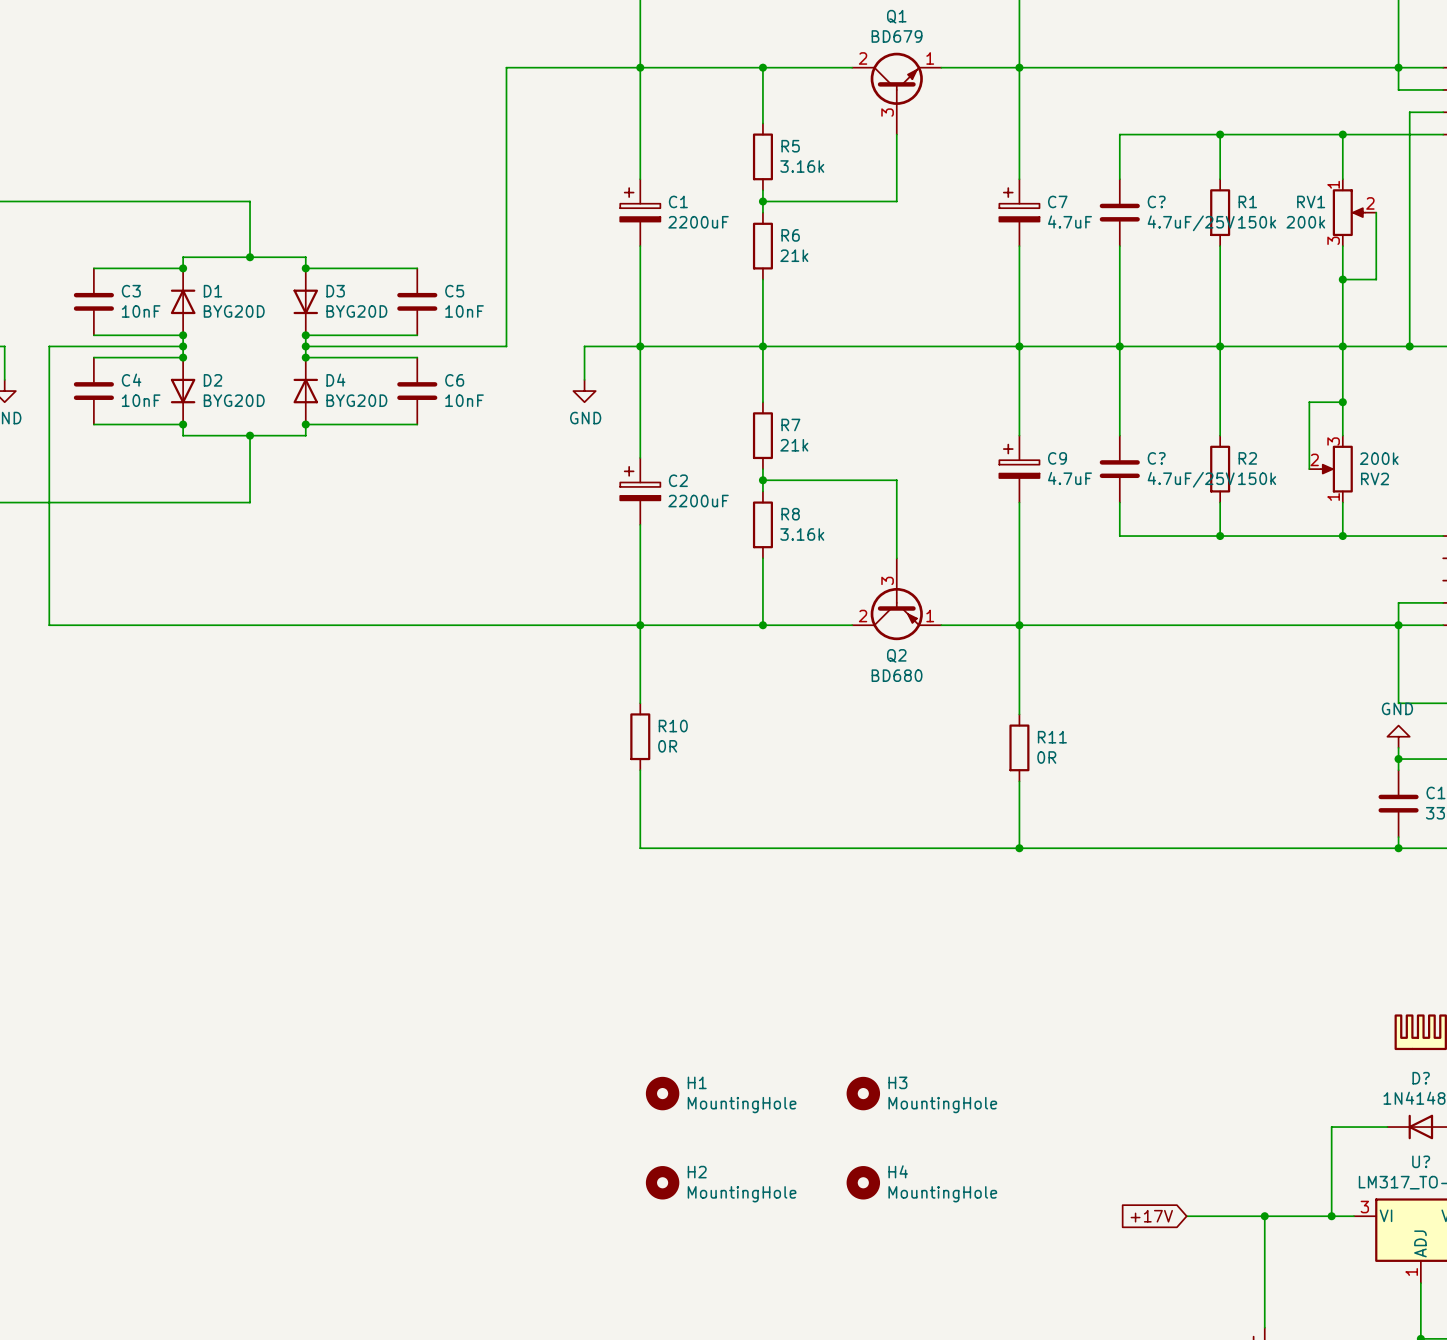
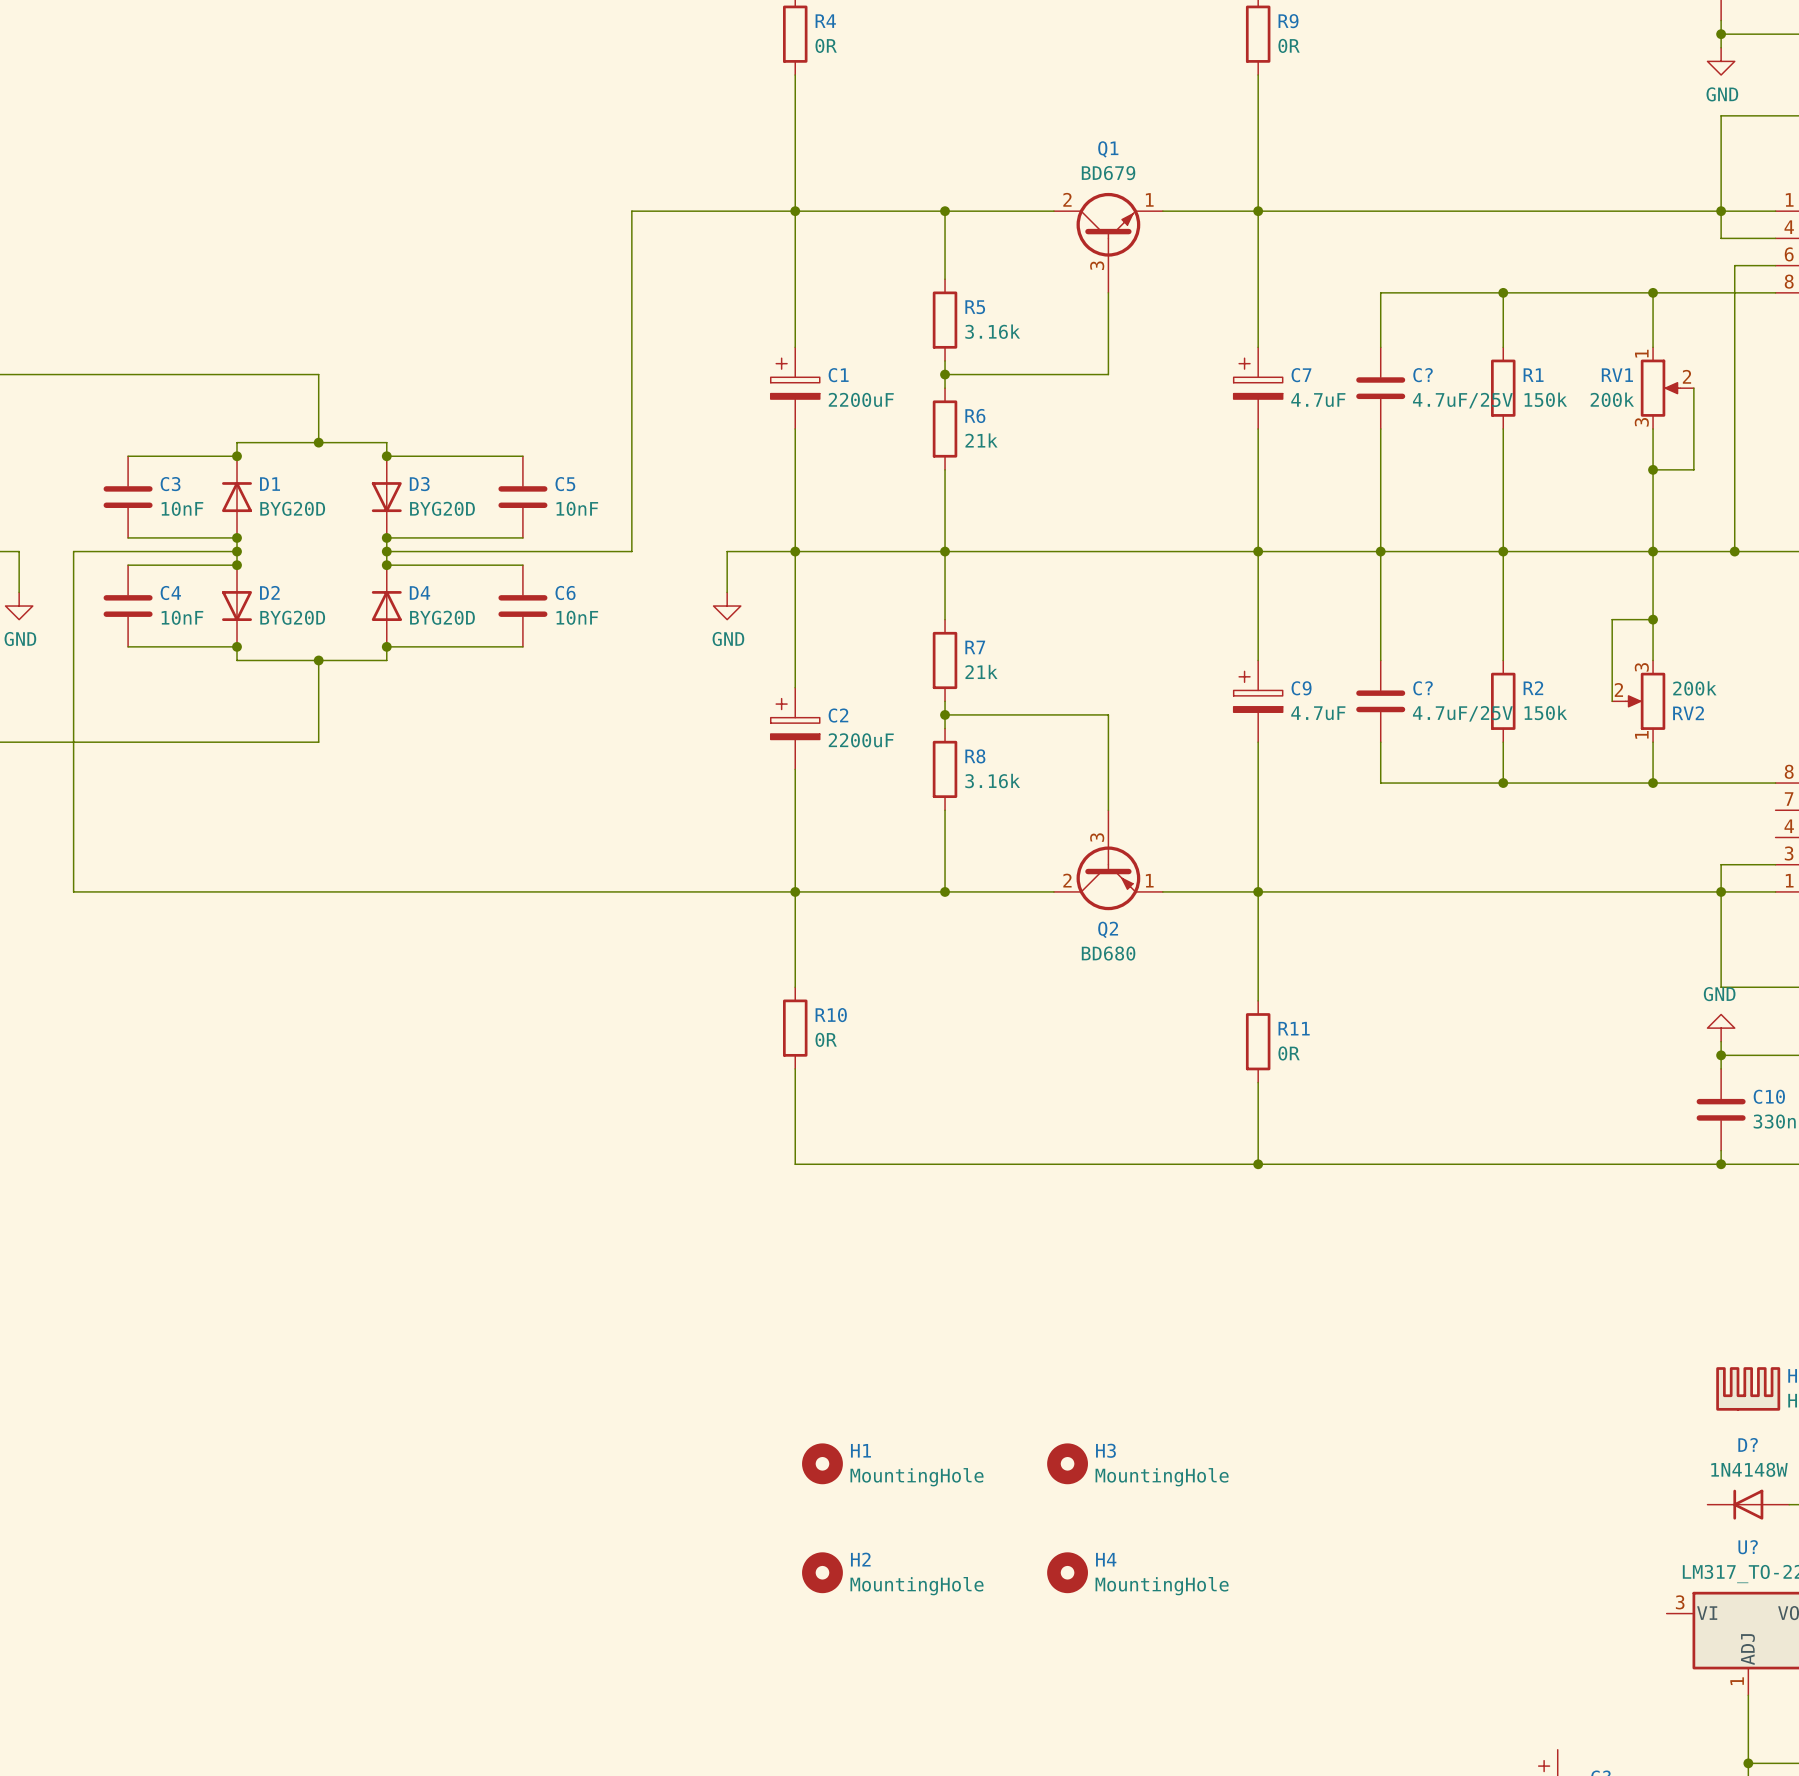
wire: (1387, 1127) (1331, 1127) (1331, 1216) -> none
global label: +17V (1151, 1216) -> none
wire: (1186, 1216) (1353, 1216) -> none
wire: (1264, 1216) (1264, 1327) -> none
junction: (1264, 1216) -> none
junction: (1331, 1216) -> none

